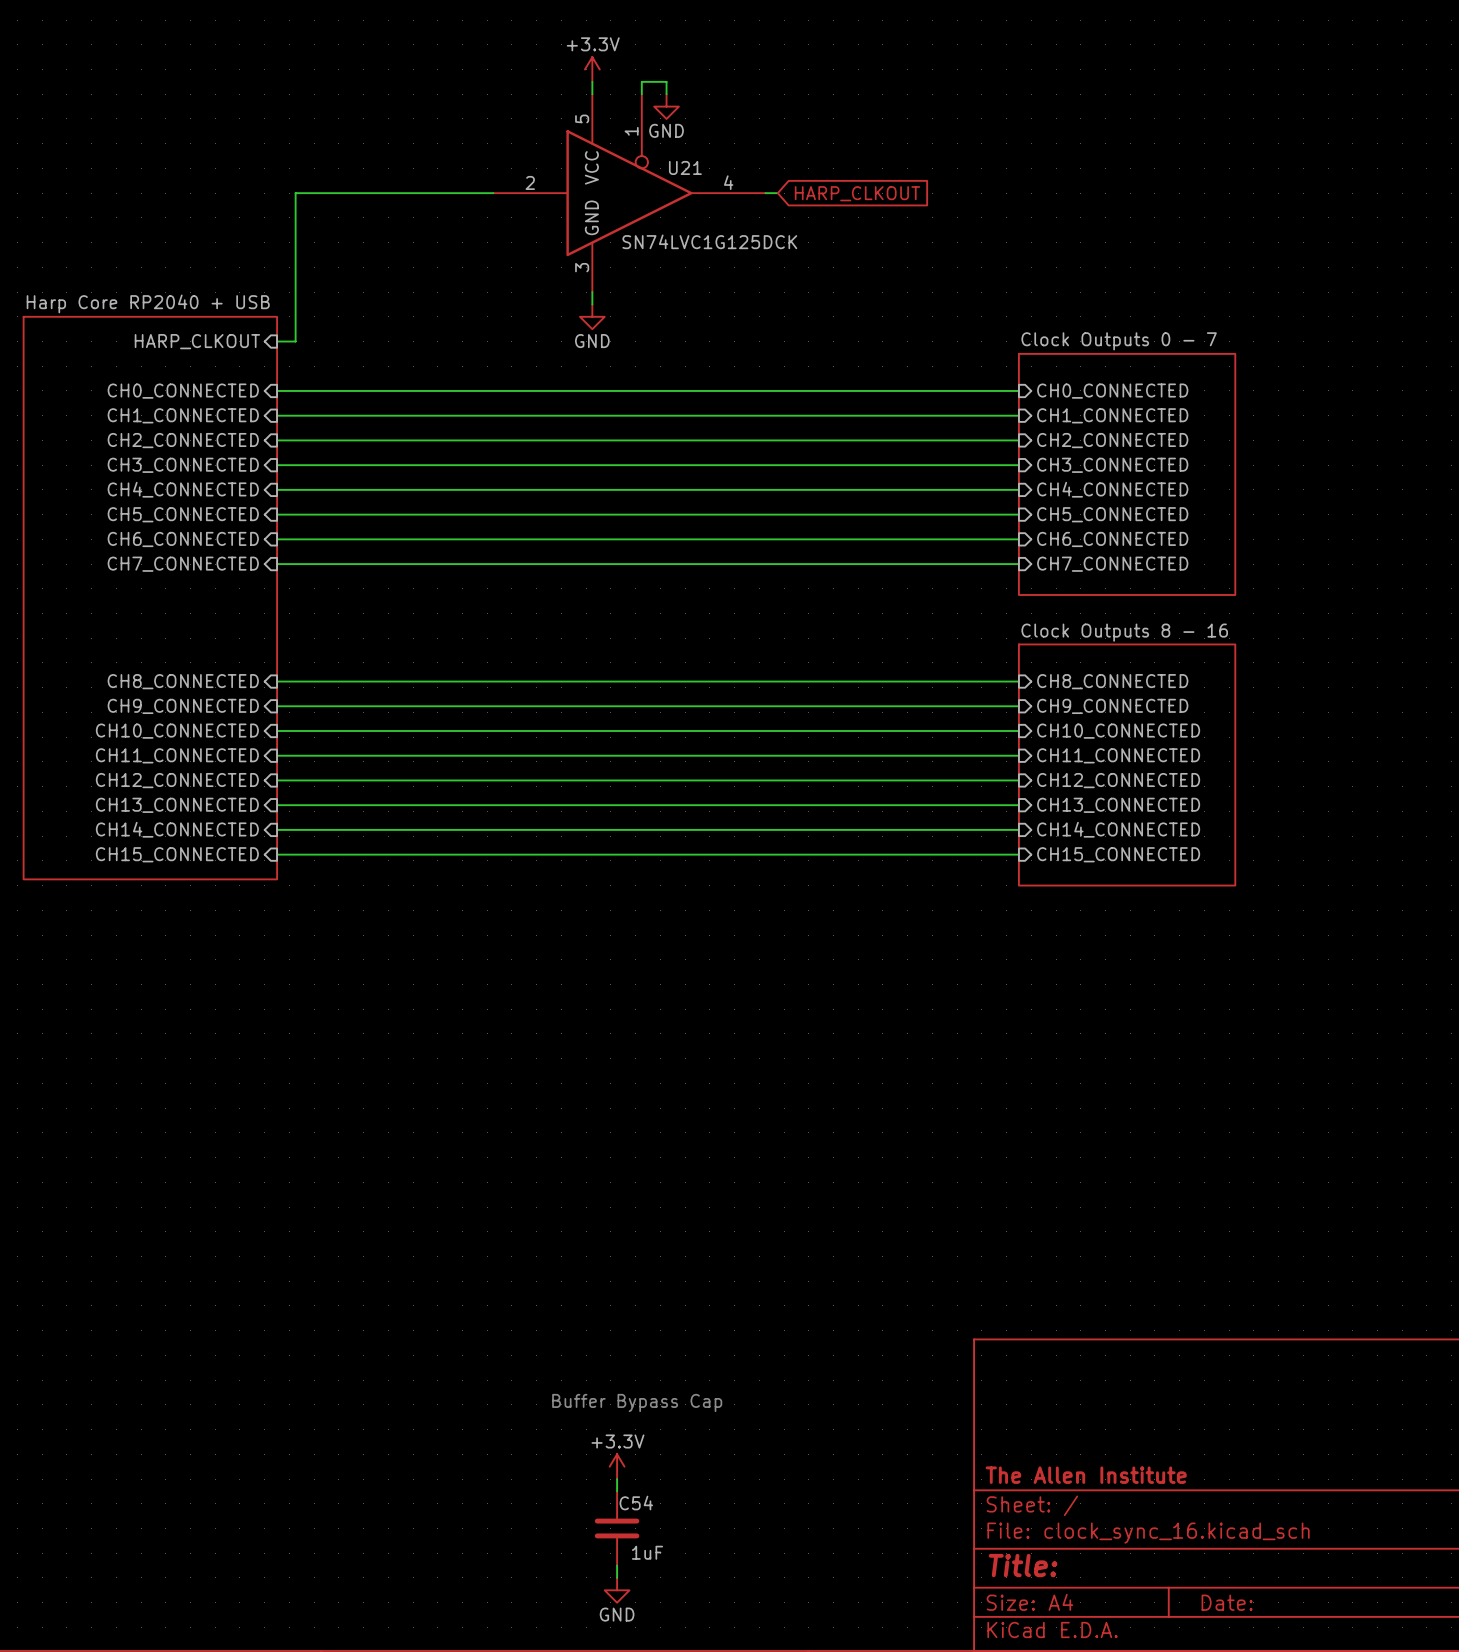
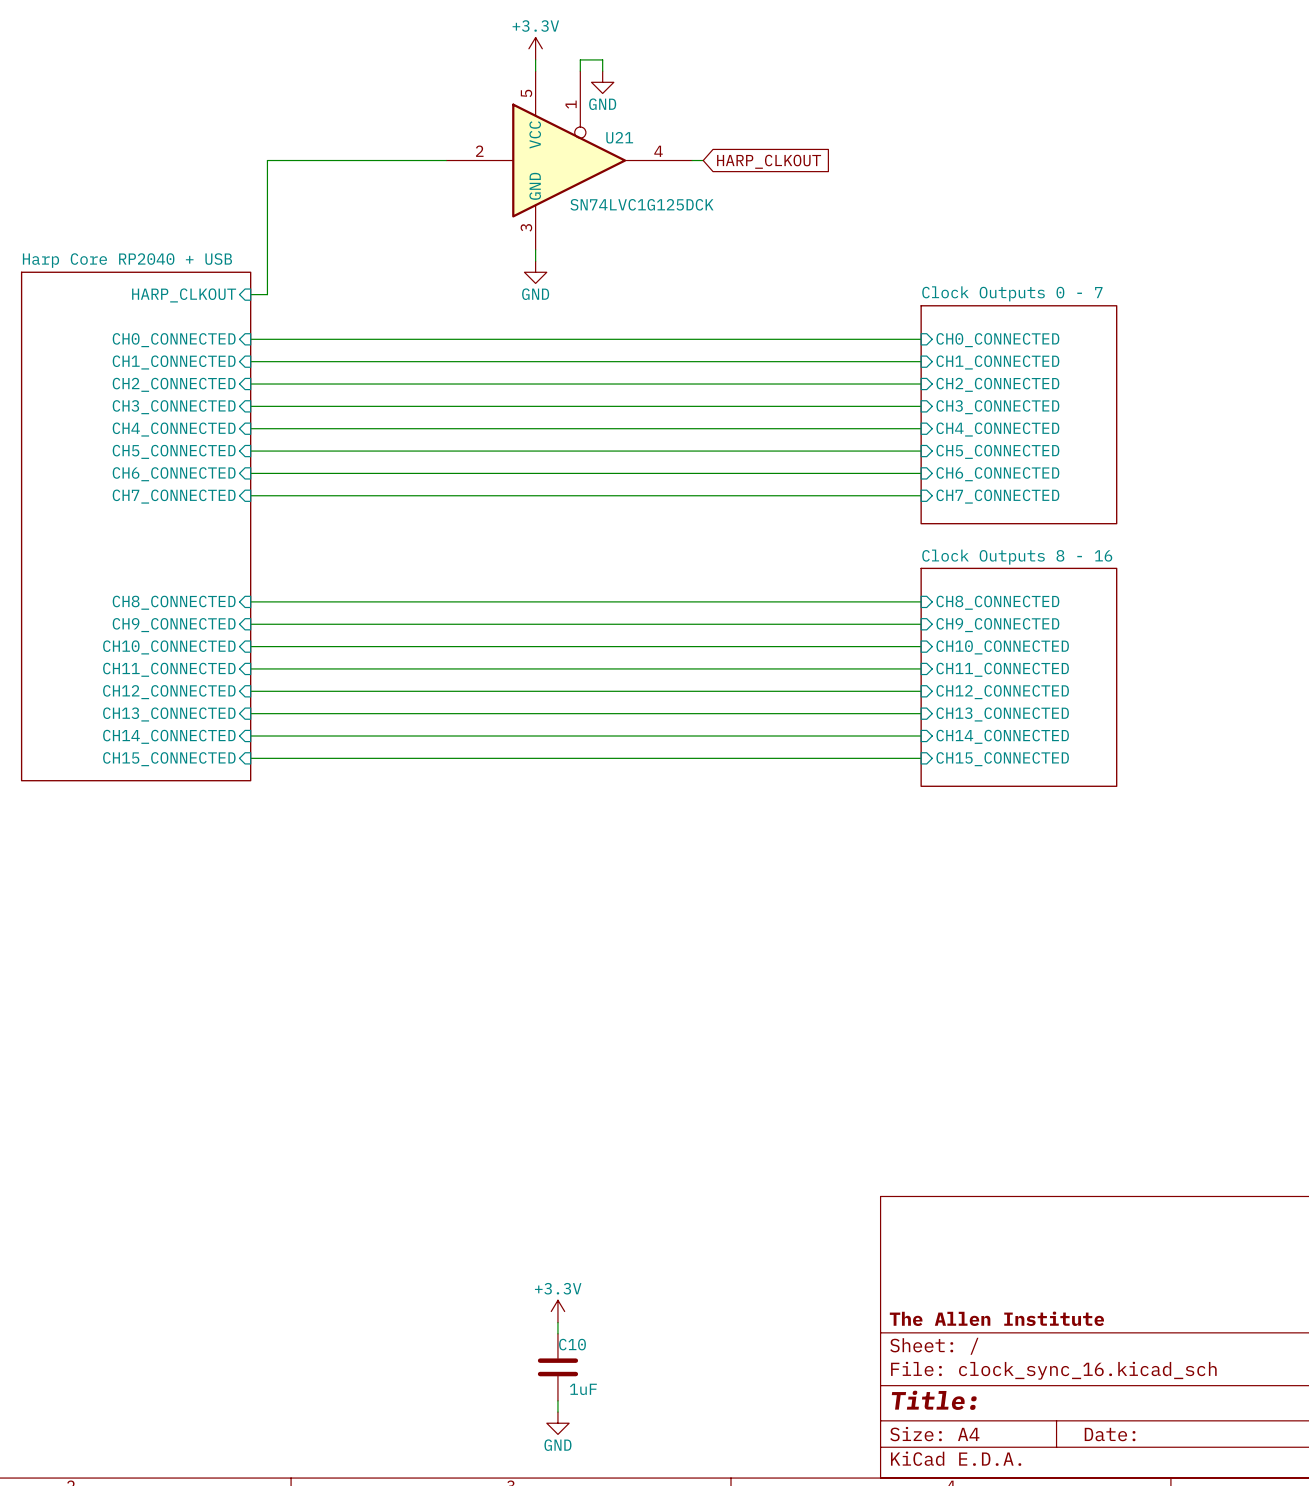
text: Buffer Bypass Cap (637, 1402) -> none
C54 name: C54 (636, 1503) -> C10 (572, 1344)

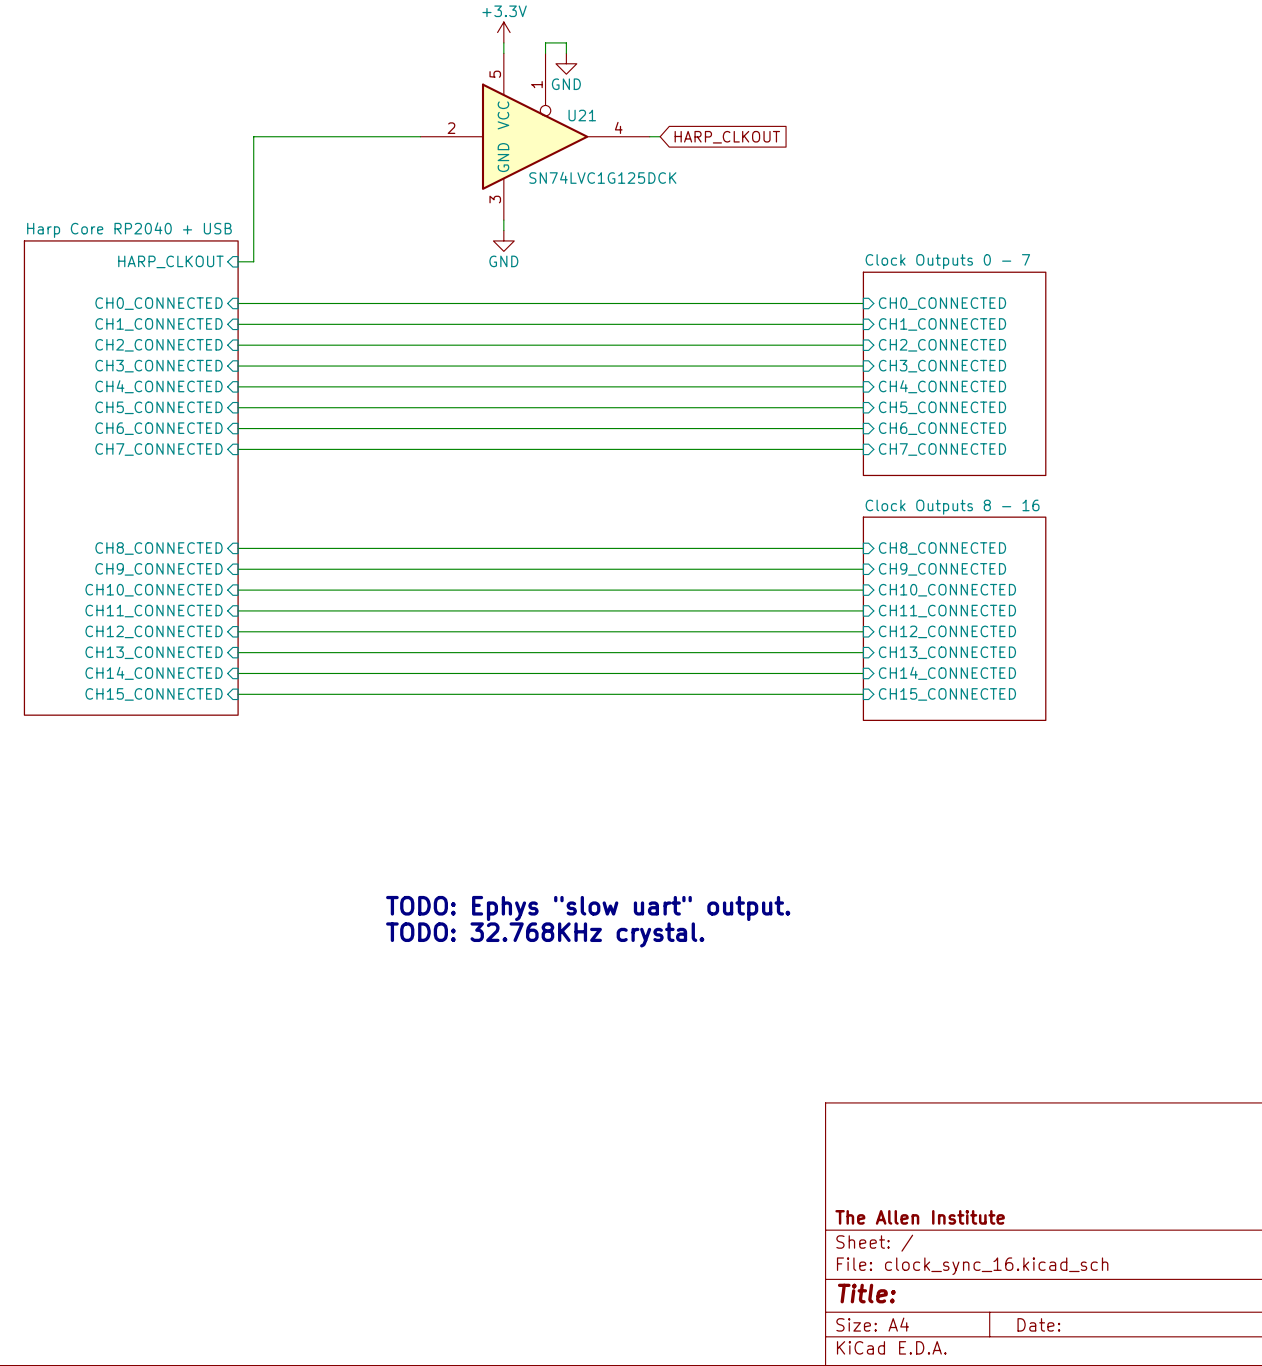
text: none -> TODO: Ephys "slow uart" output. (588, 908)
text: none -> TODO: 32.768KHz crystal. (545, 934)
power symbol: +3.3V (557, 1311) -> none
wire: (557, 1322) (557, 1333) -> none
C10: 1uF (557, 1367) -> none
wire: (557, 1400) (557, 1412) -> none
power symbol: GND (557, 1423) -> none

